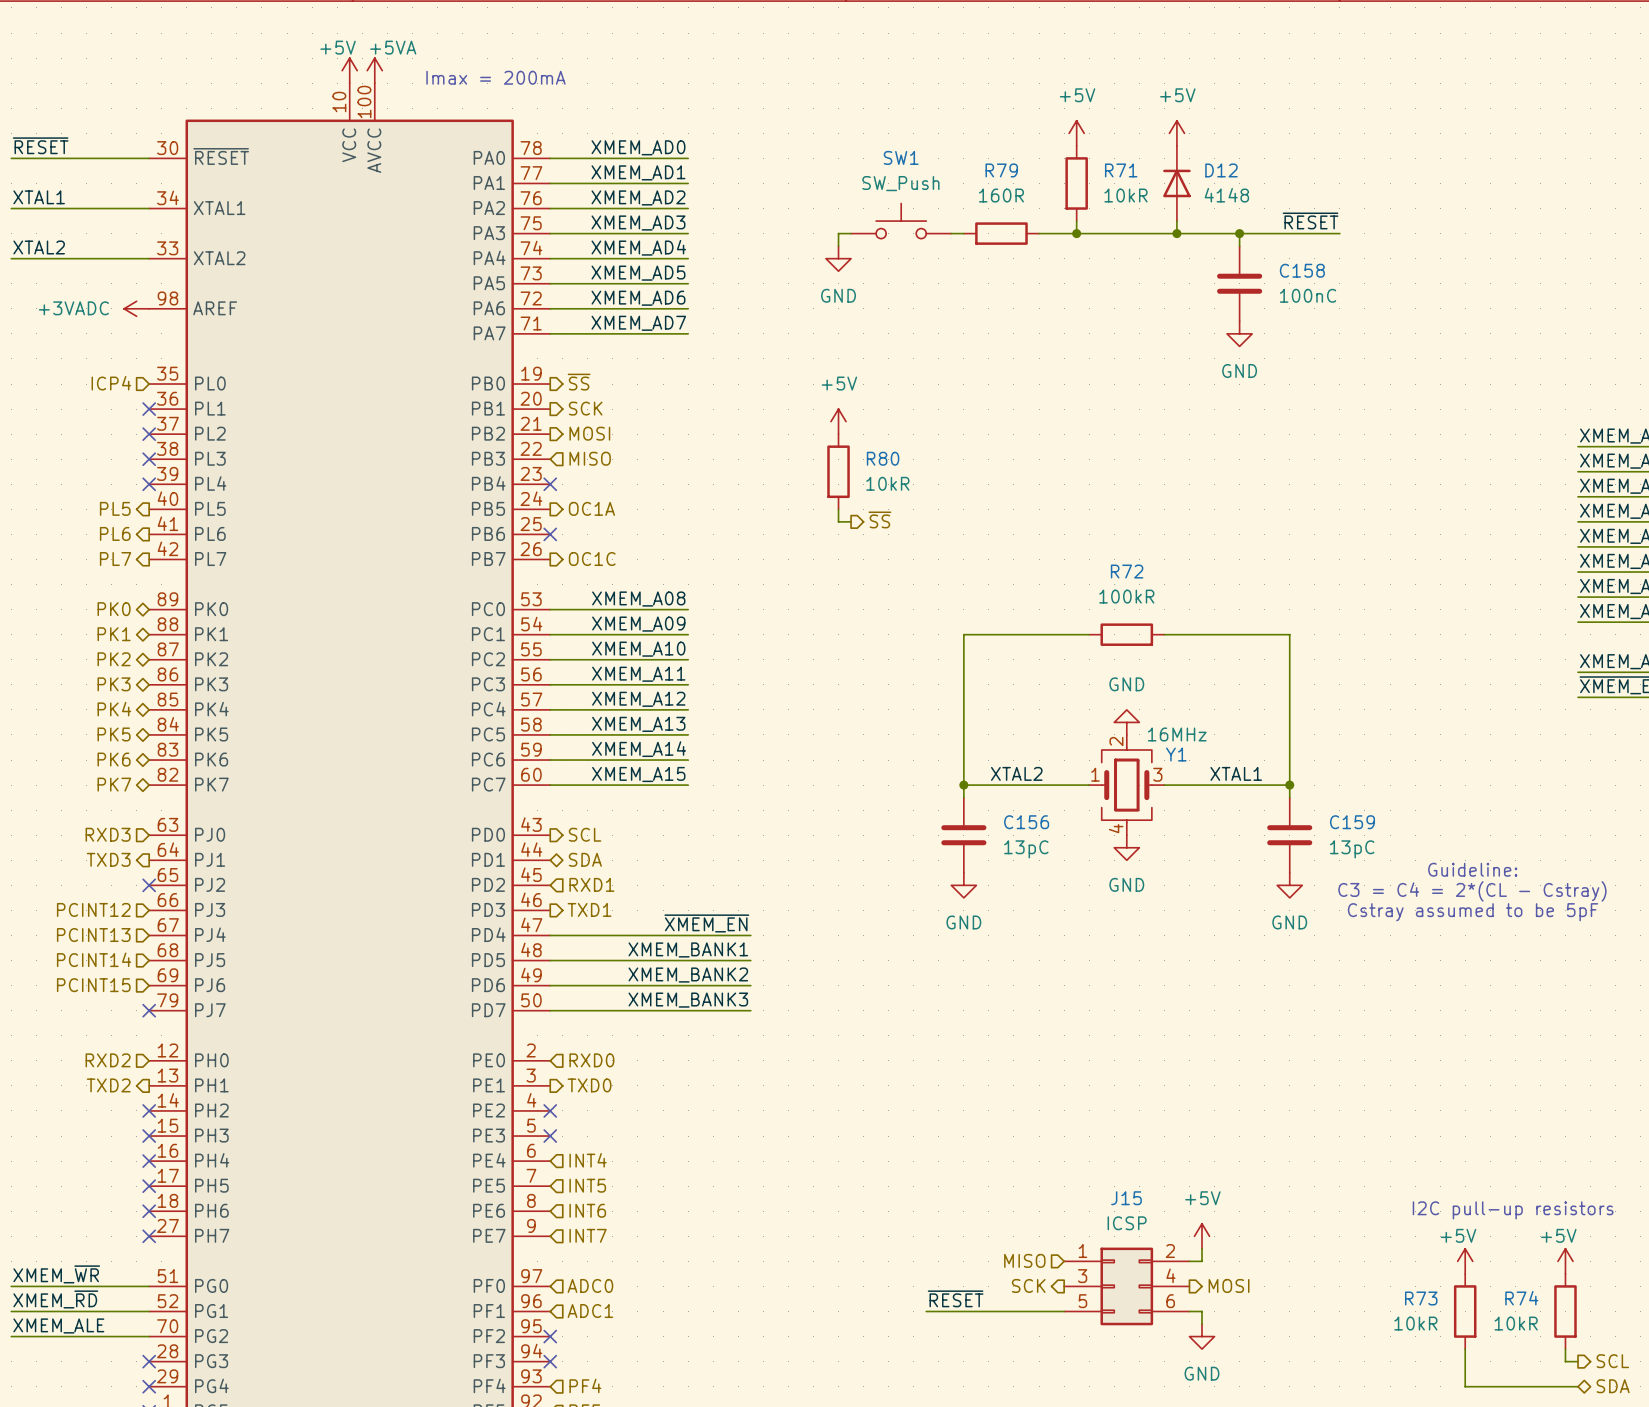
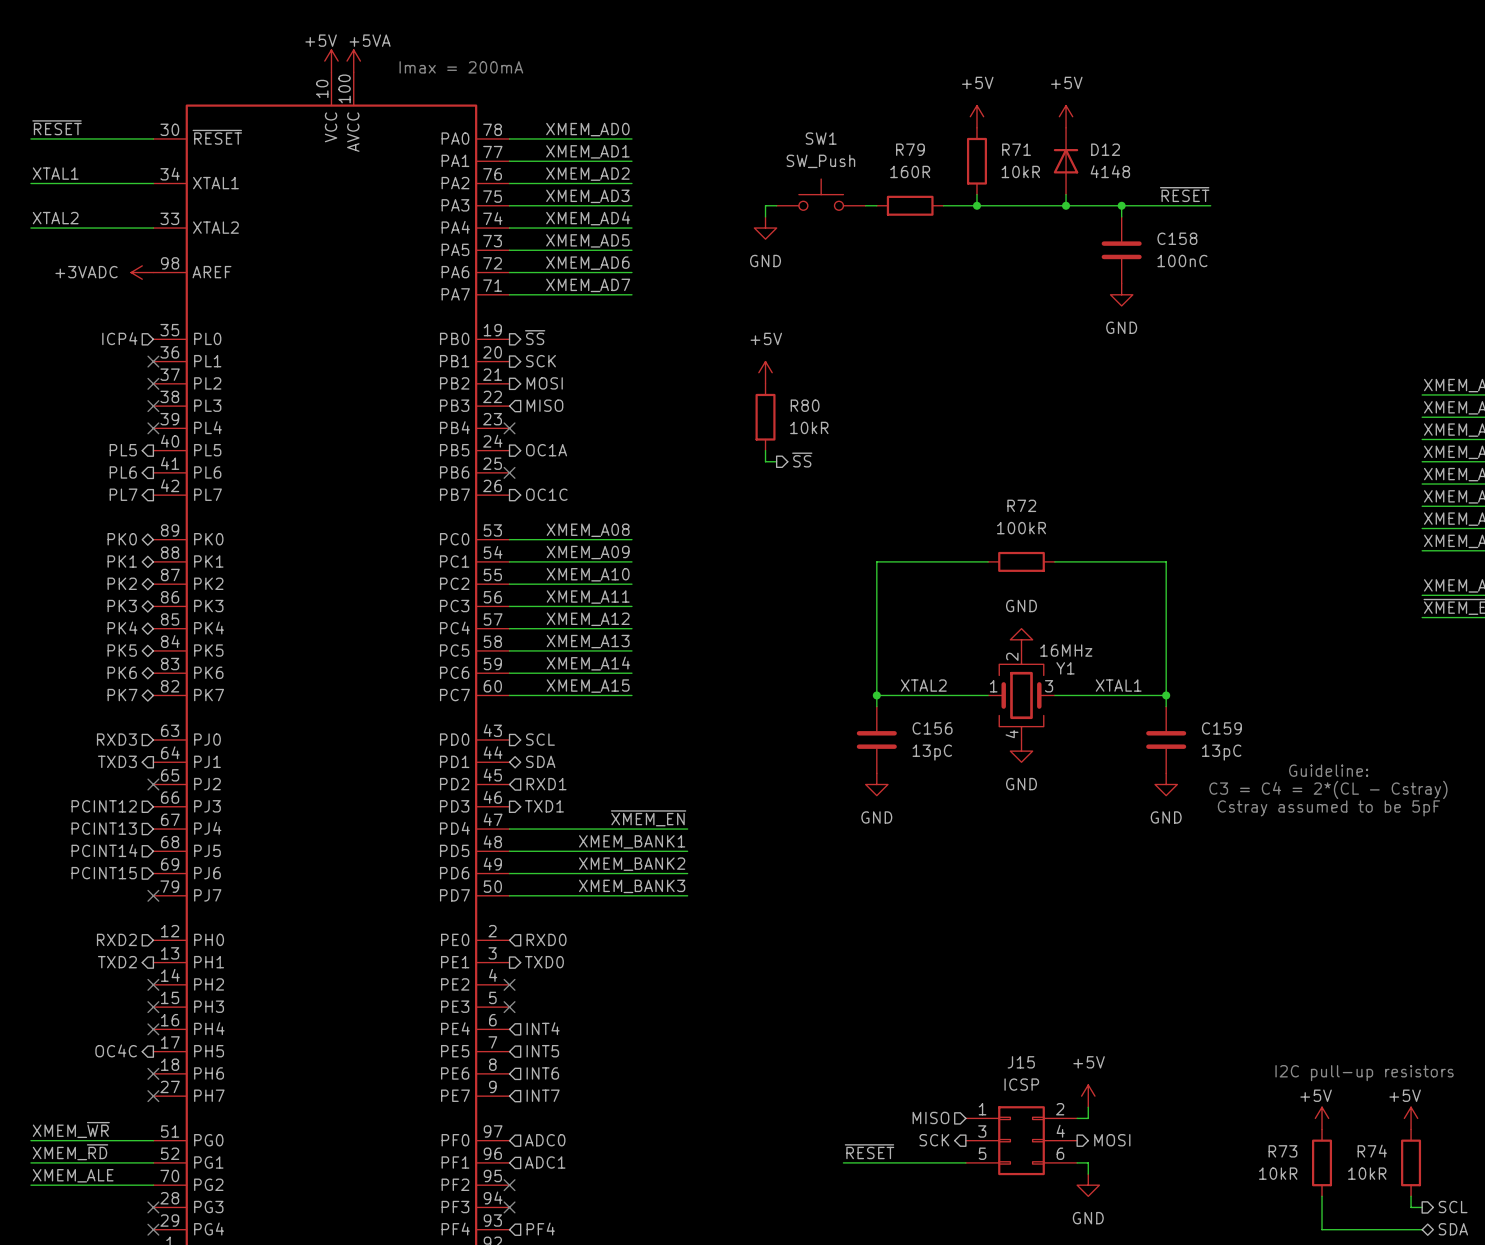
hierarchical label: none -> OC4C (116, 1050)
no-connect mark: (149, 1186) -> none

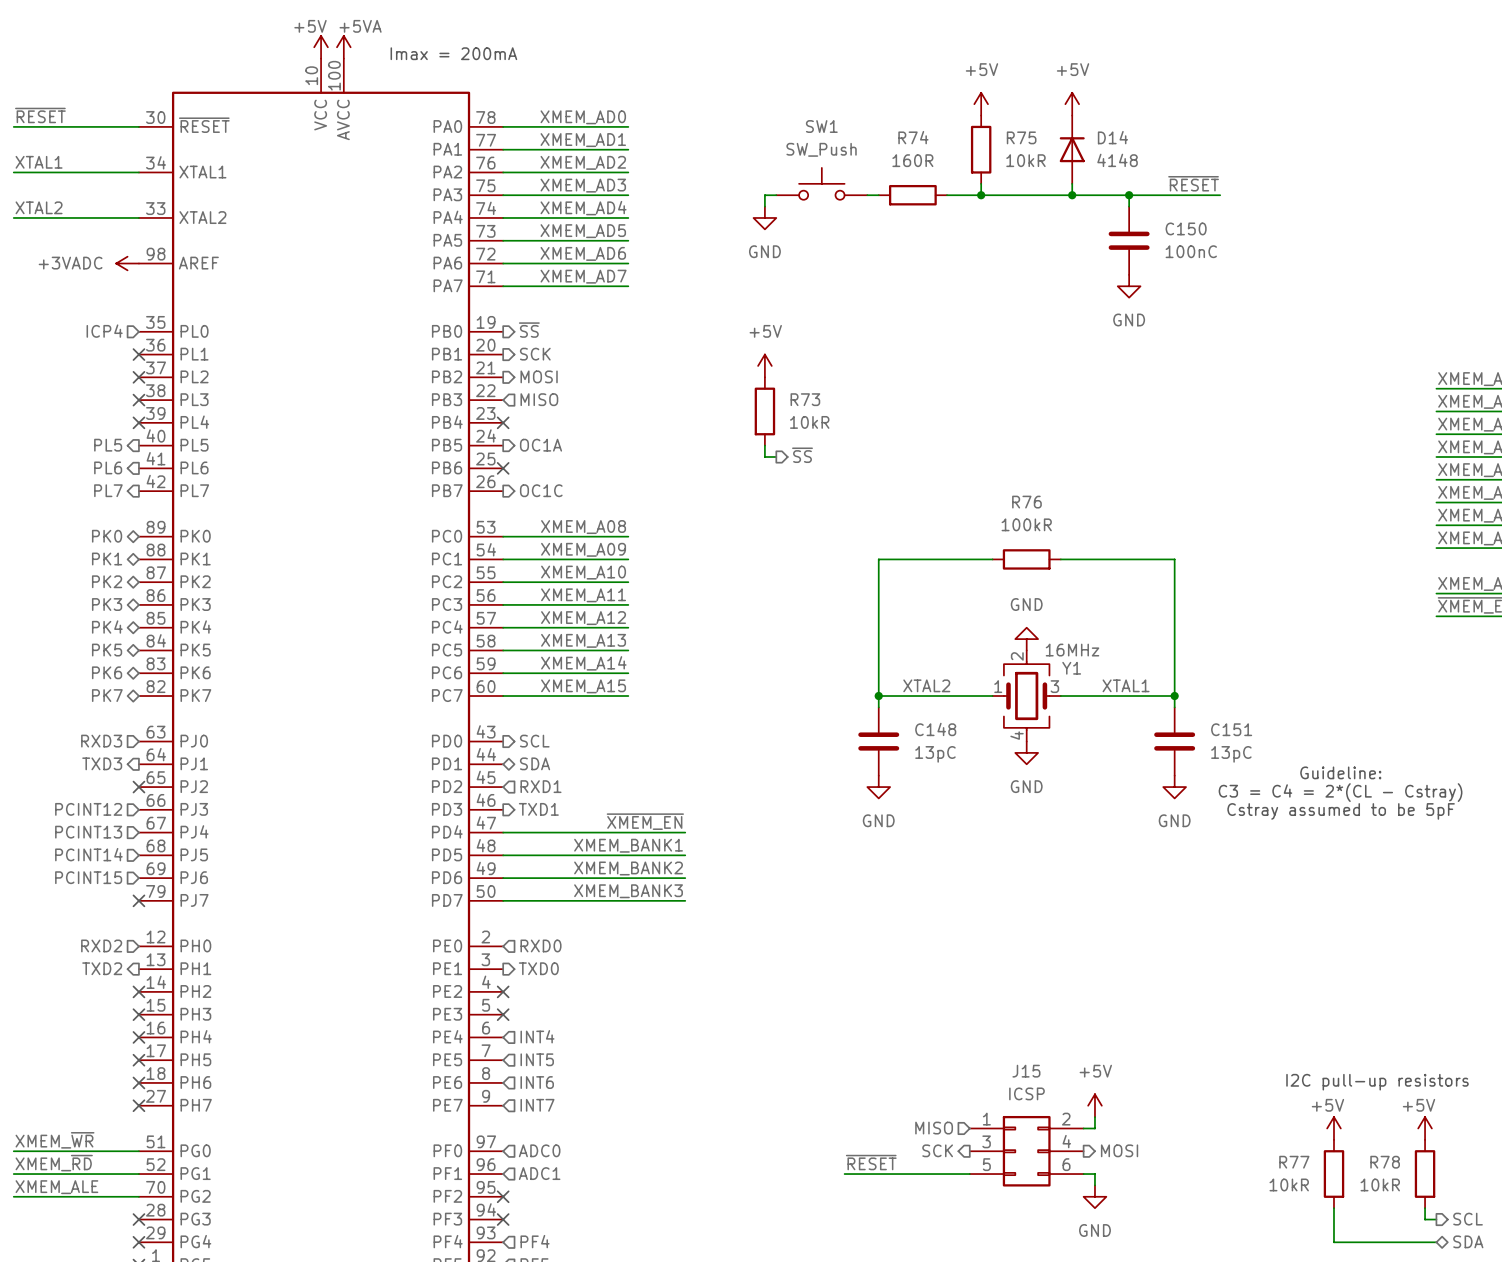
R79 name: R79 (910, 149) -> R74 (913, 137)
R71 name: R71 (1016, 149) -> R75 (1021, 137)
D12 name: D12 (1105, 149) -> D14 (1112, 137)
C158 name: C158 (1177, 238) -> C150 (1186, 228)
R80 name: R80 (805, 405) -> R73 (805, 399)
R72 name: R72 (1021, 505) -> R76 (1026, 502)
C156 name: C156 (932, 728) -> C148 (935, 729)
C159 name: C159 (1221, 728) -> C151 (1231, 729)
hierarchical label: OC4C (116, 1050) -> none
no-connect mark: none -> (138, 1060)
R73 name: R73 (1282, 1151) -> R77 (1294, 1162)
R74 name: R74 (1372, 1151) -> R78 (1385, 1162)

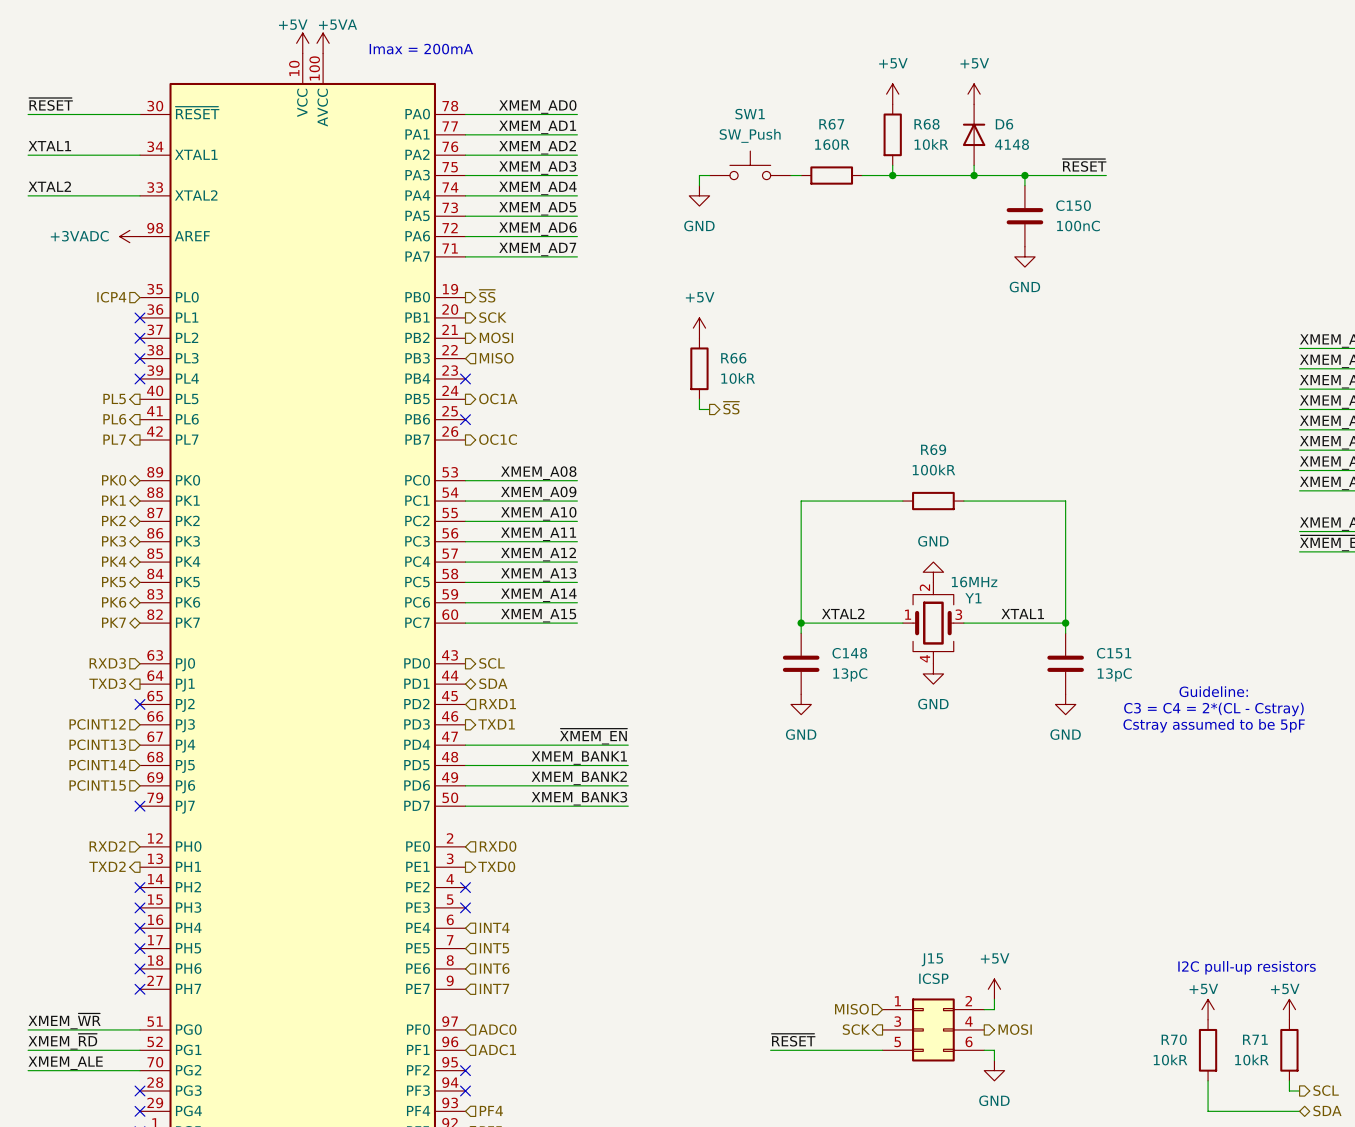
R74 name: R74 (913, 137) -> R67 (831, 124)
R75 name: R75 (1021, 137) -> R68 (926, 124)
D14 name: D14 (1112, 137) -> D6 (1004, 124)
R73 name: R73 (805, 399) -> R66 (733, 358)
R76 name: R76 (1026, 502) -> R69 (933, 449)
R77 name: R77 (1294, 1162) -> R70 (1174, 1039)
R78 name: R78 (1385, 1162) -> R71 (1255, 1039)

